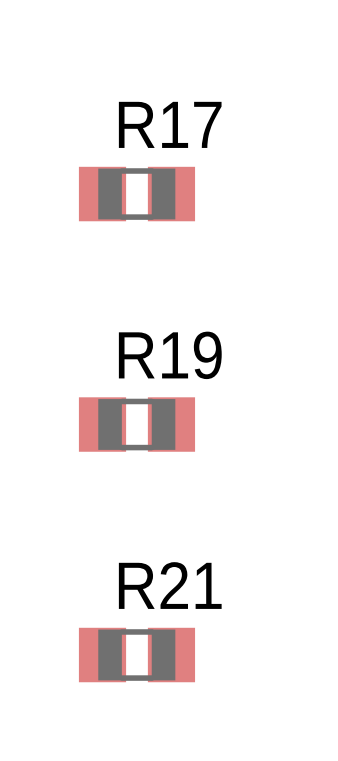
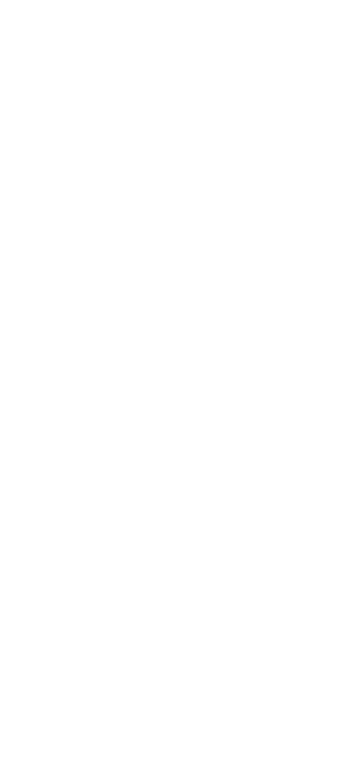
R17: (136, 194) -> none
R19: (136, 424) -> none
R21: (136, 655) -> none

